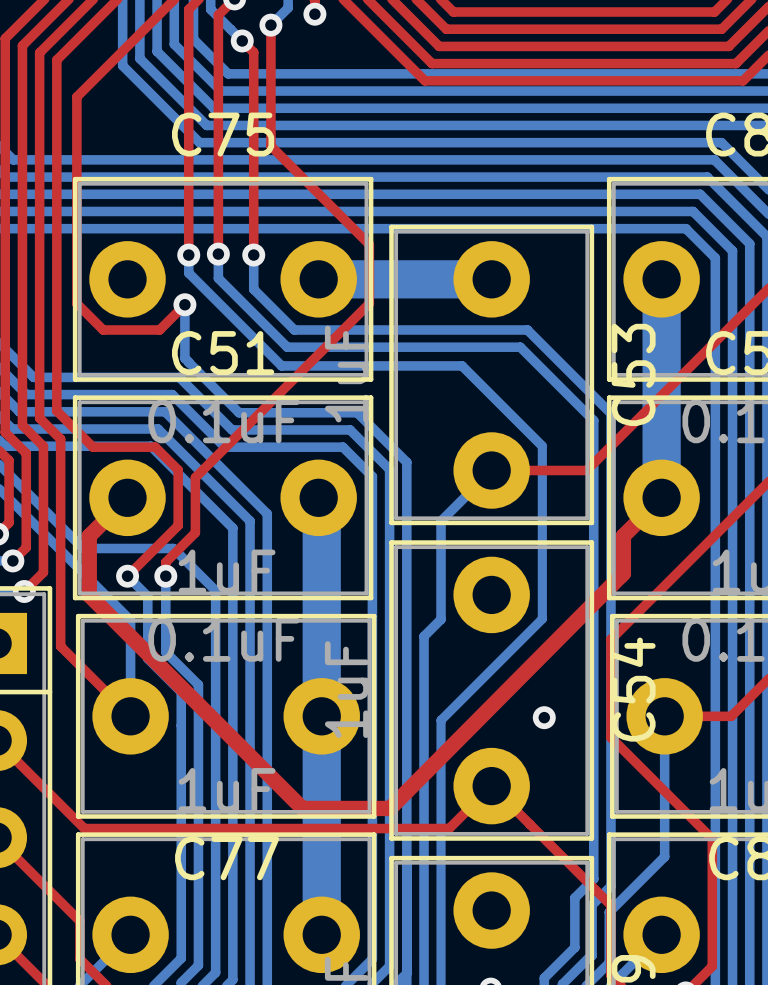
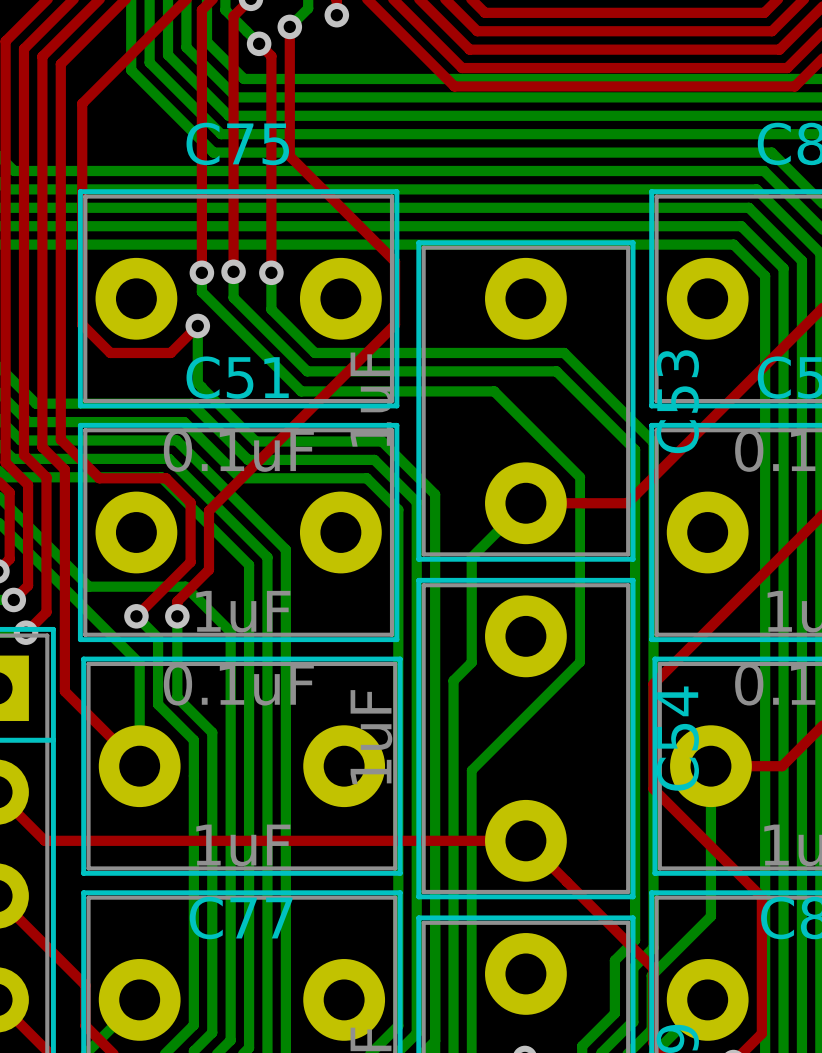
bottom track: (318, 279) (491, 279) -> none
bottom track: (661, 279) (661, 497) -> none
top track: (127, 497) (89, 536) (89, 595) (302, 808) (390, 808) (623, 573) (623, 536) (661, 497) -> none
bottom track: (318, 497) (321, 500) (321, 934) -> none
via: (544, 717) -> none
top track: (41, 786) (84, 828) (449, 828) (491, 786) -> (44, 840) (525, 840)

